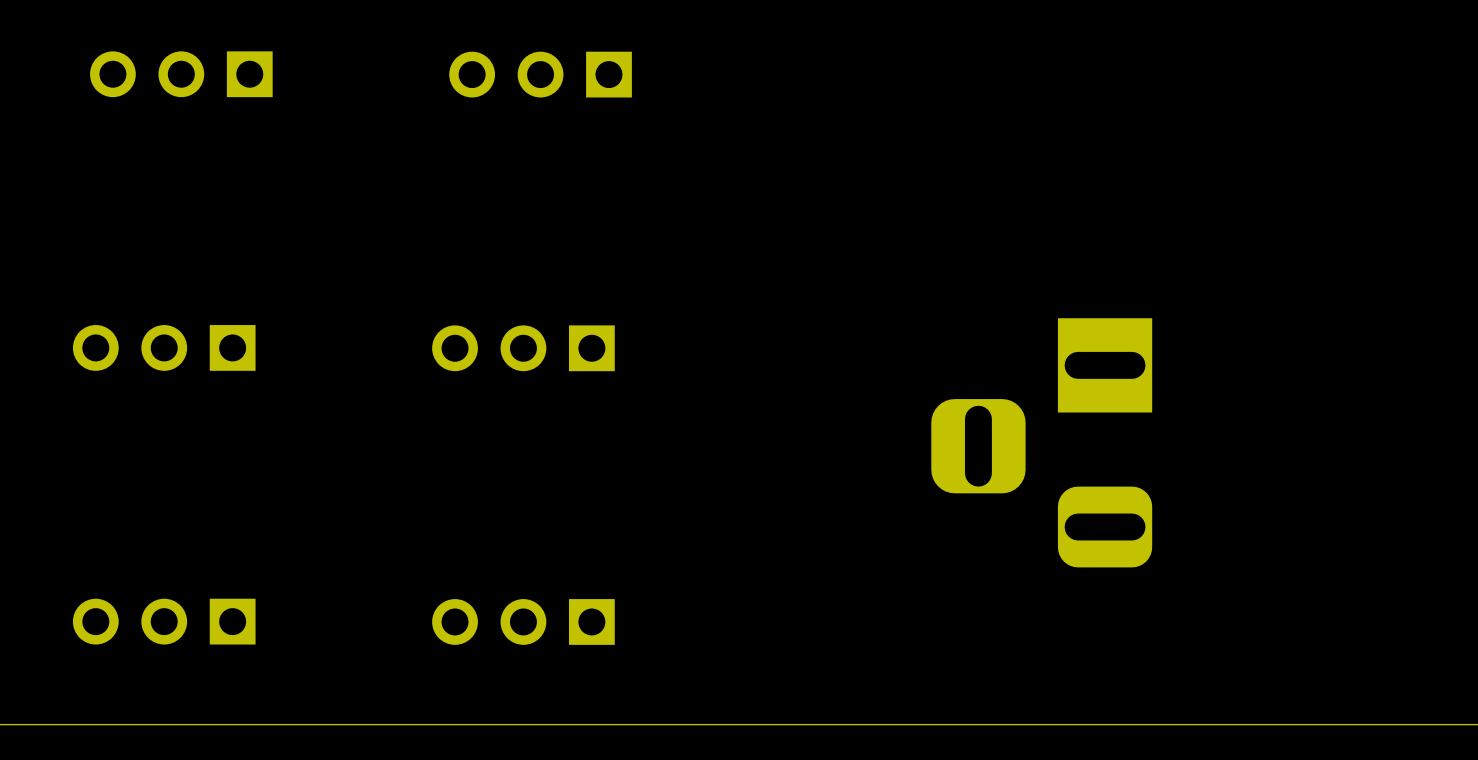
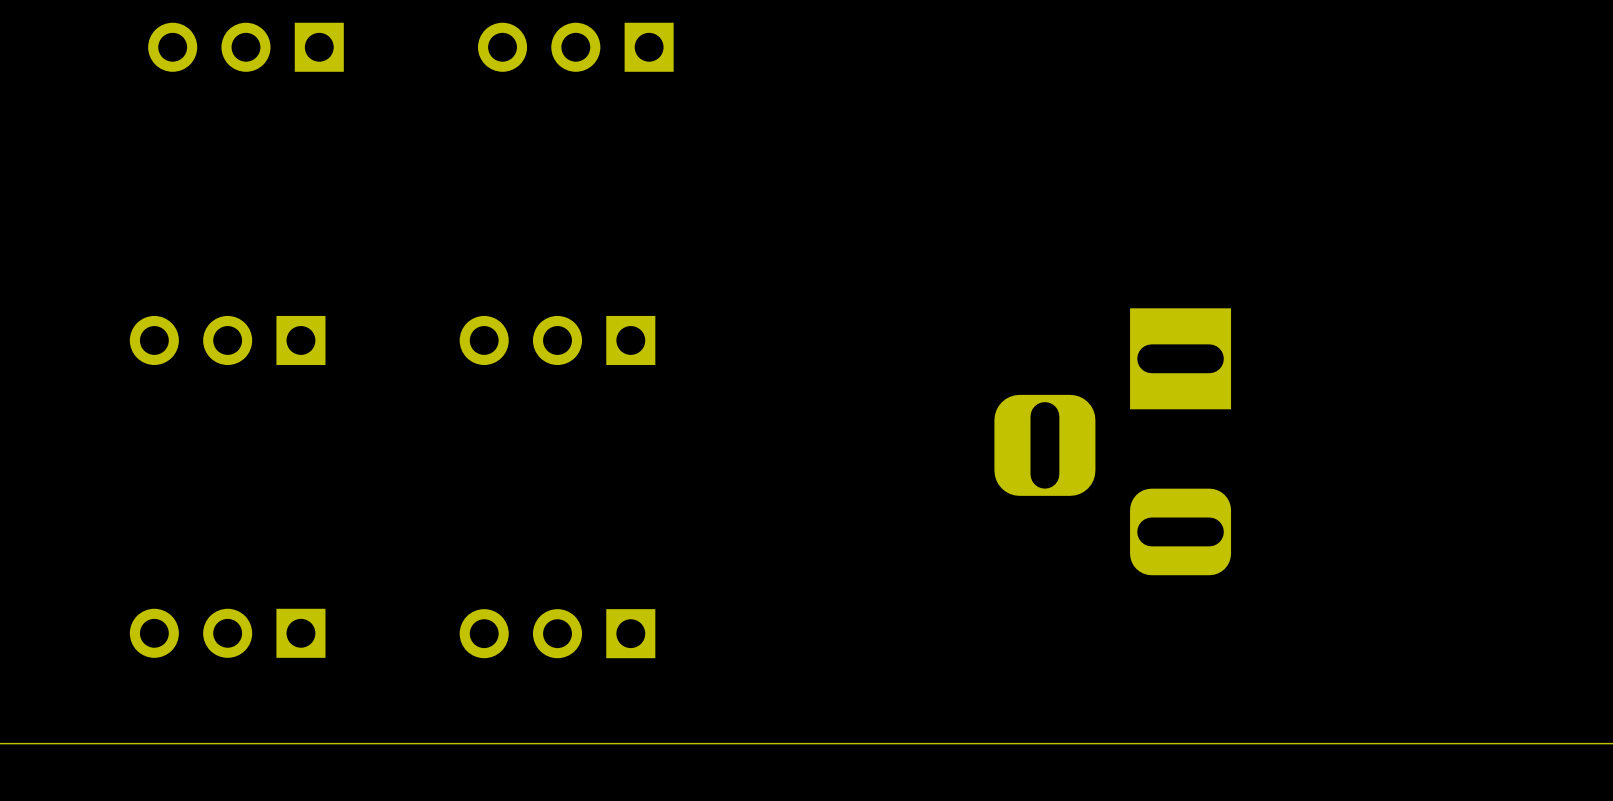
part position: (181, 74) -> (245, 47)
part position: (164, 347) -> (227, 340)
part position: (164, 621) -> (227, 633)

